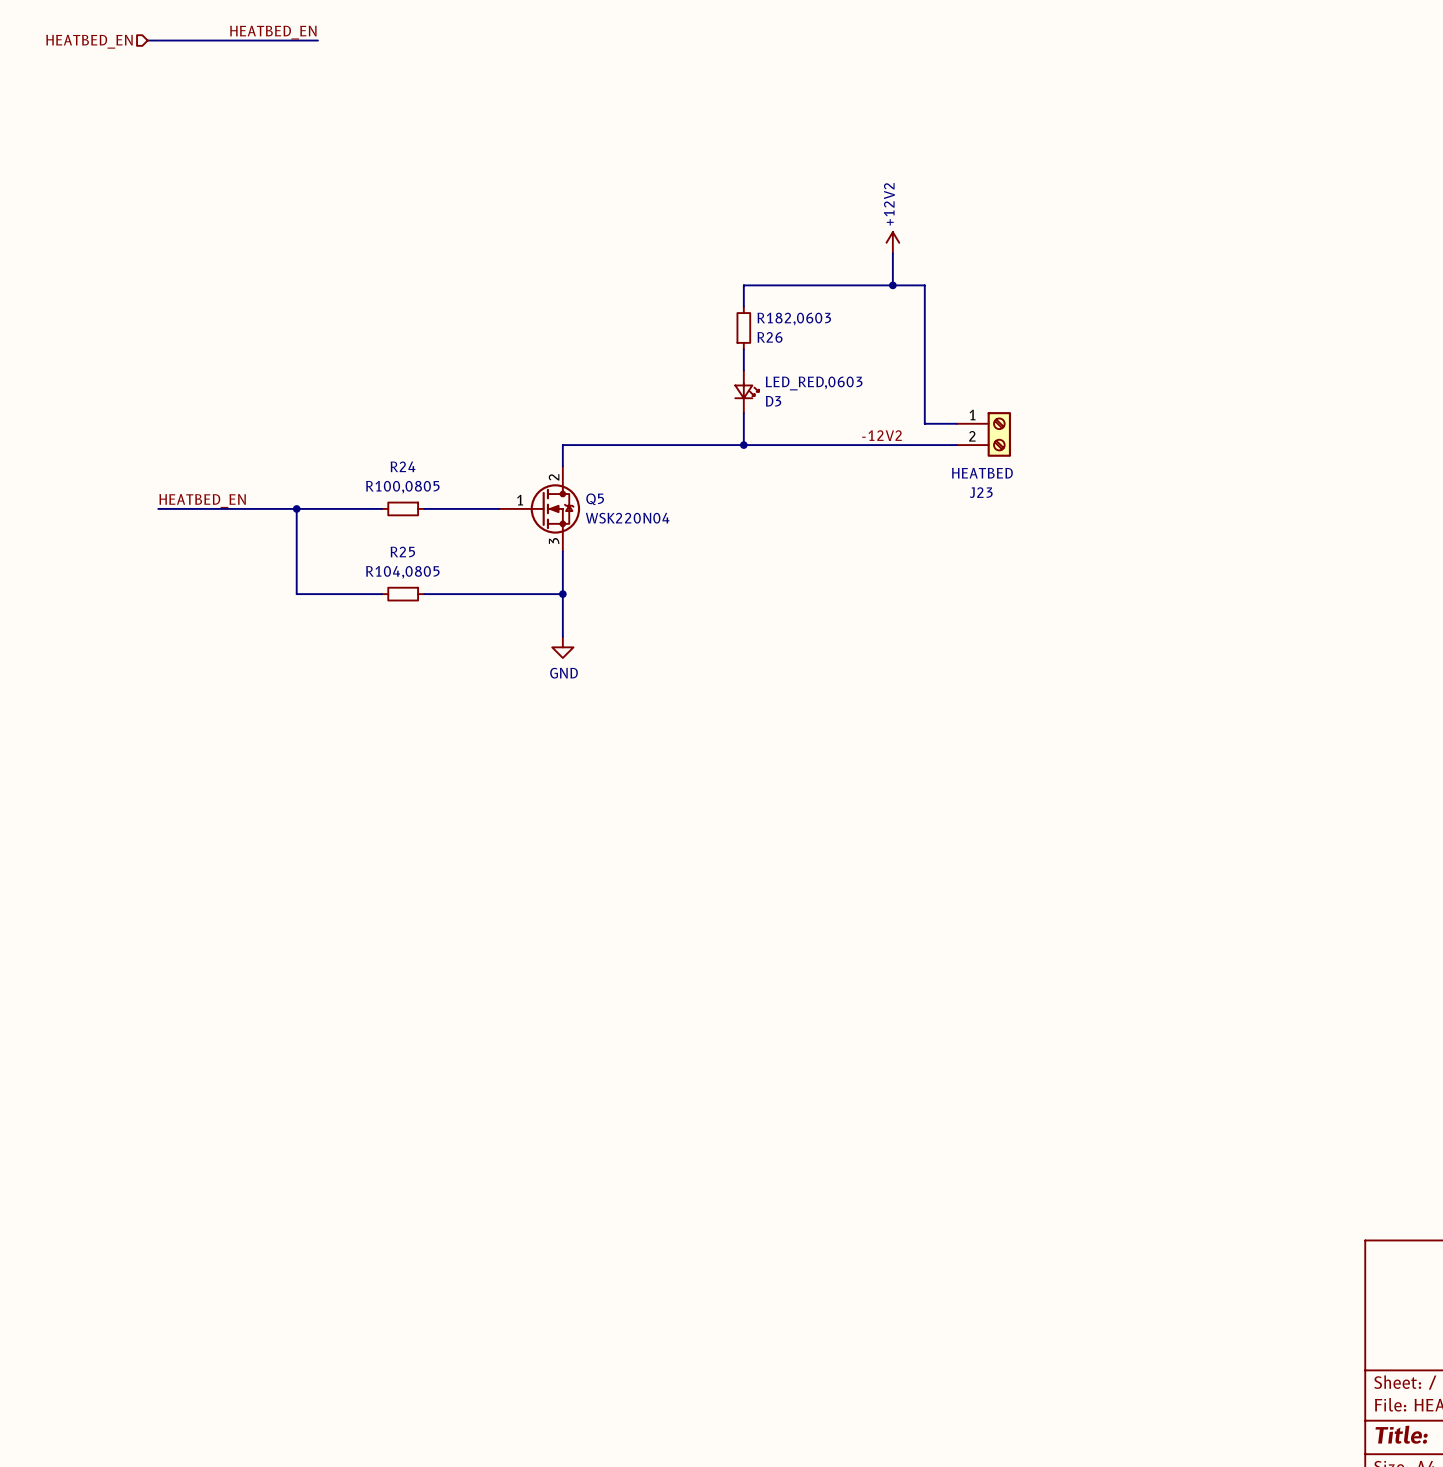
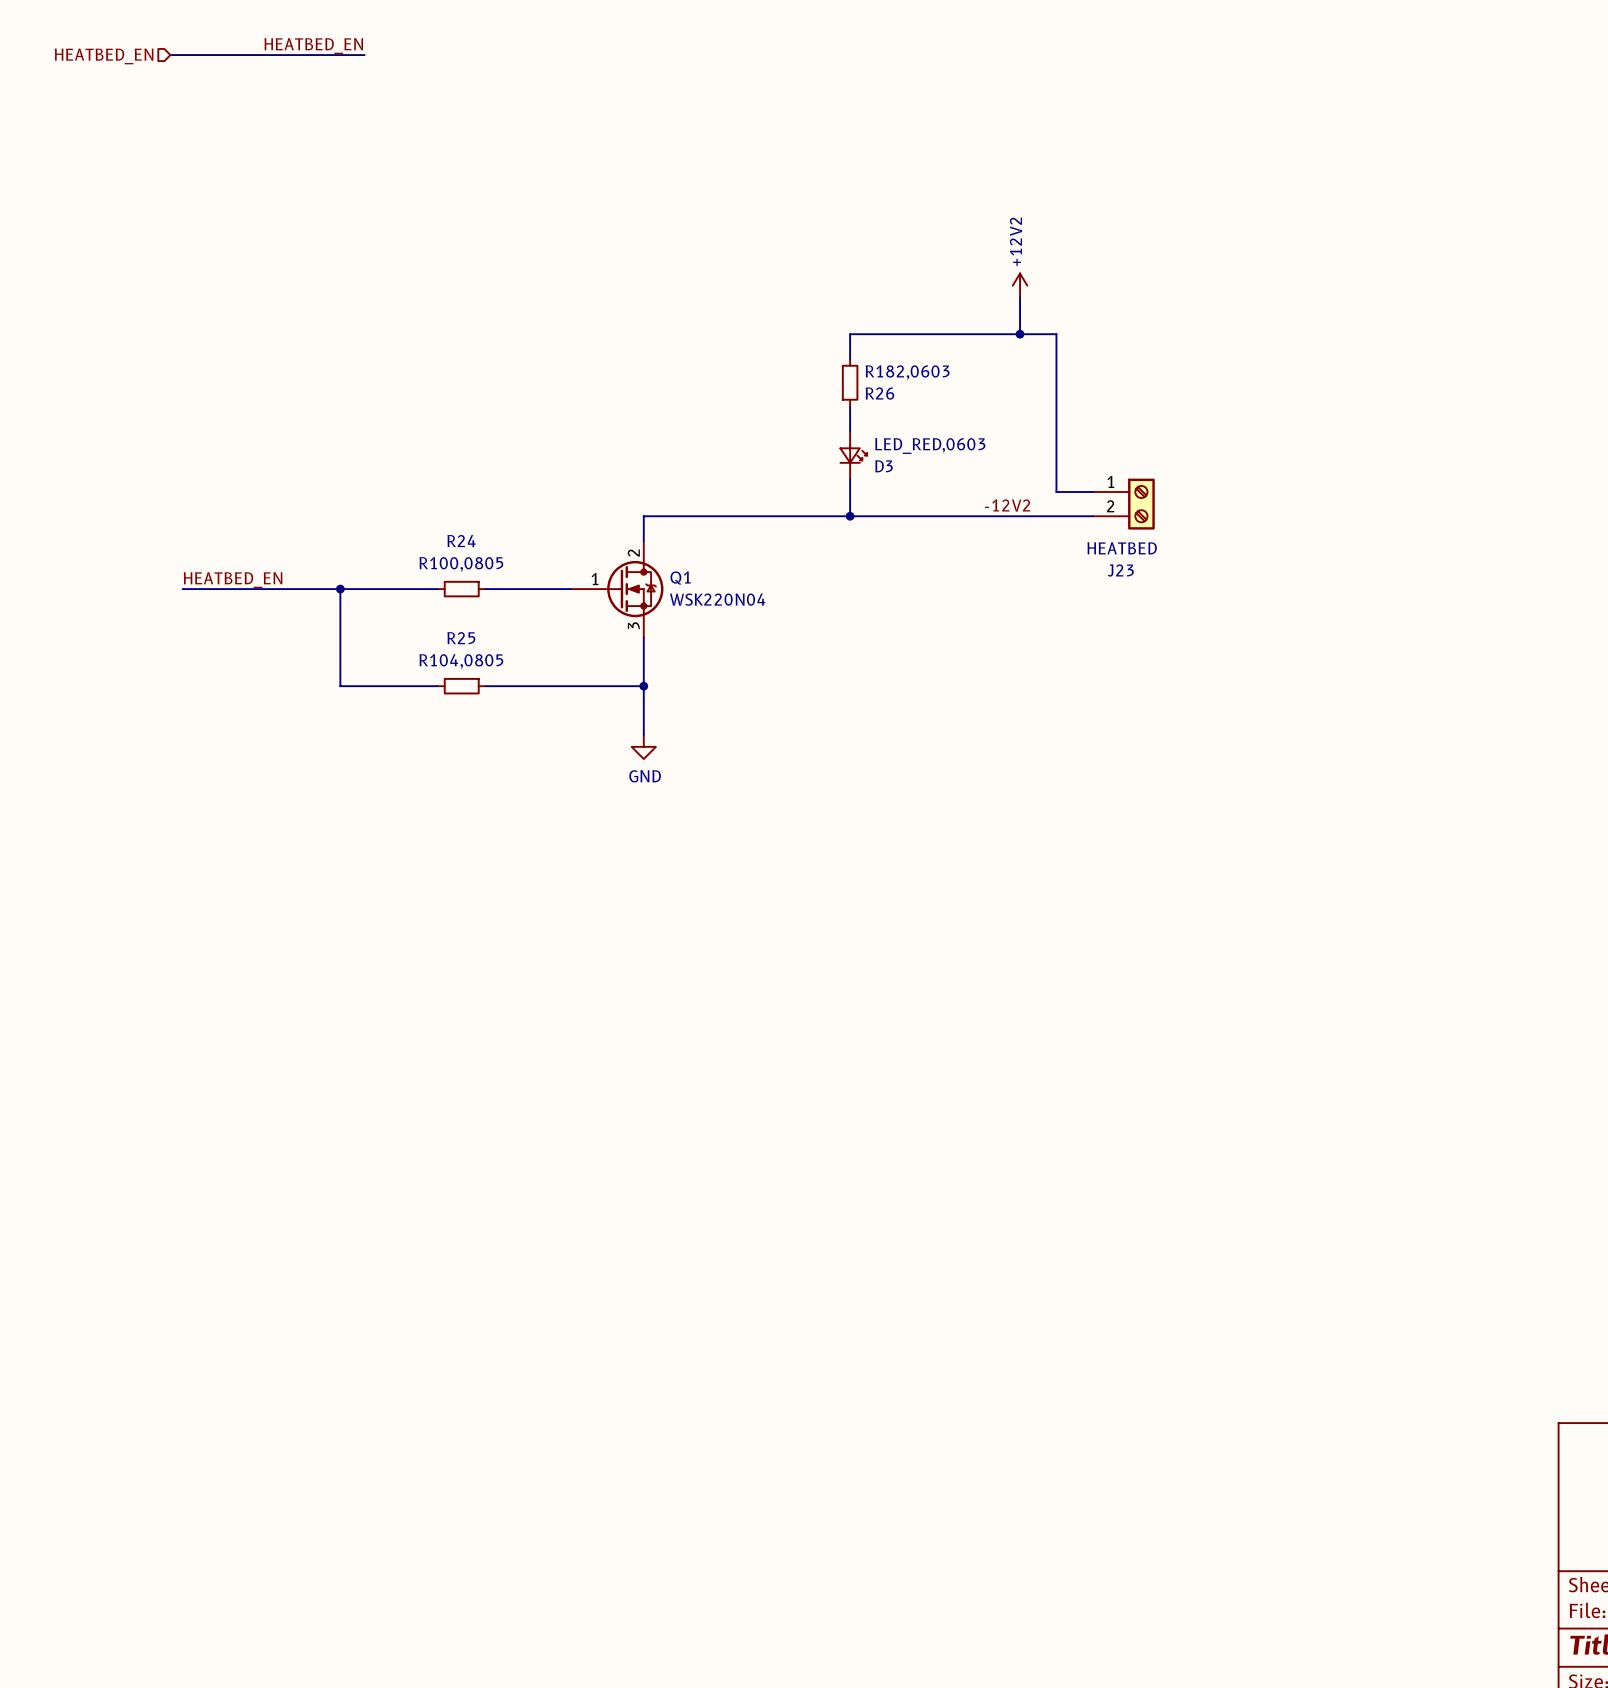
Q5 name: Q5 (595, 499) -> Q1 (680, 578)

